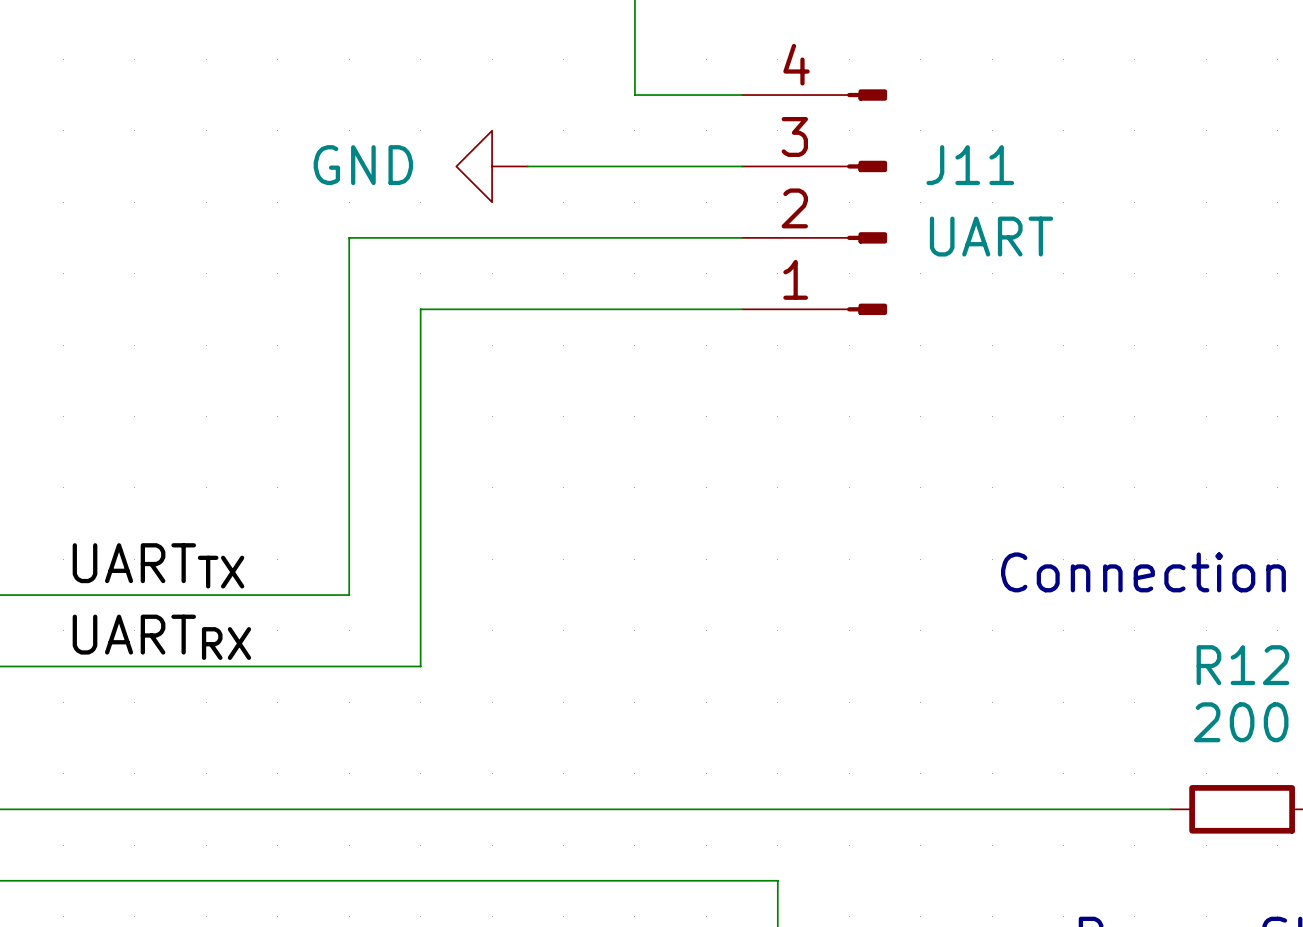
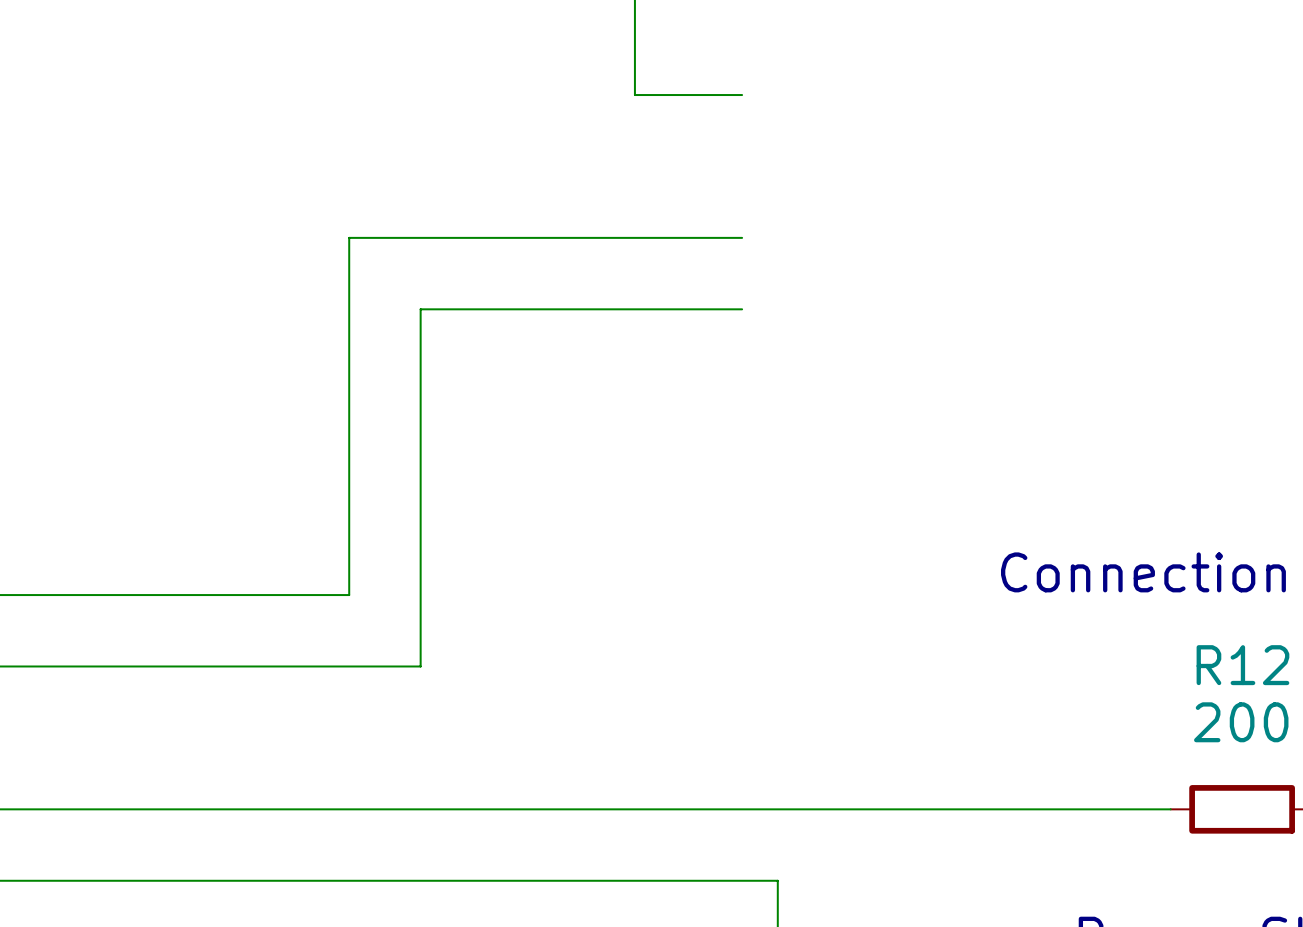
power symbol: GND (492, 166) -> none
wire: (527, 166) (742, 166) -> none
J11: UART (814, 202) -> none
label: UARTTX (158, 565) -> none
label: UARTRX (161, 637) -> none

